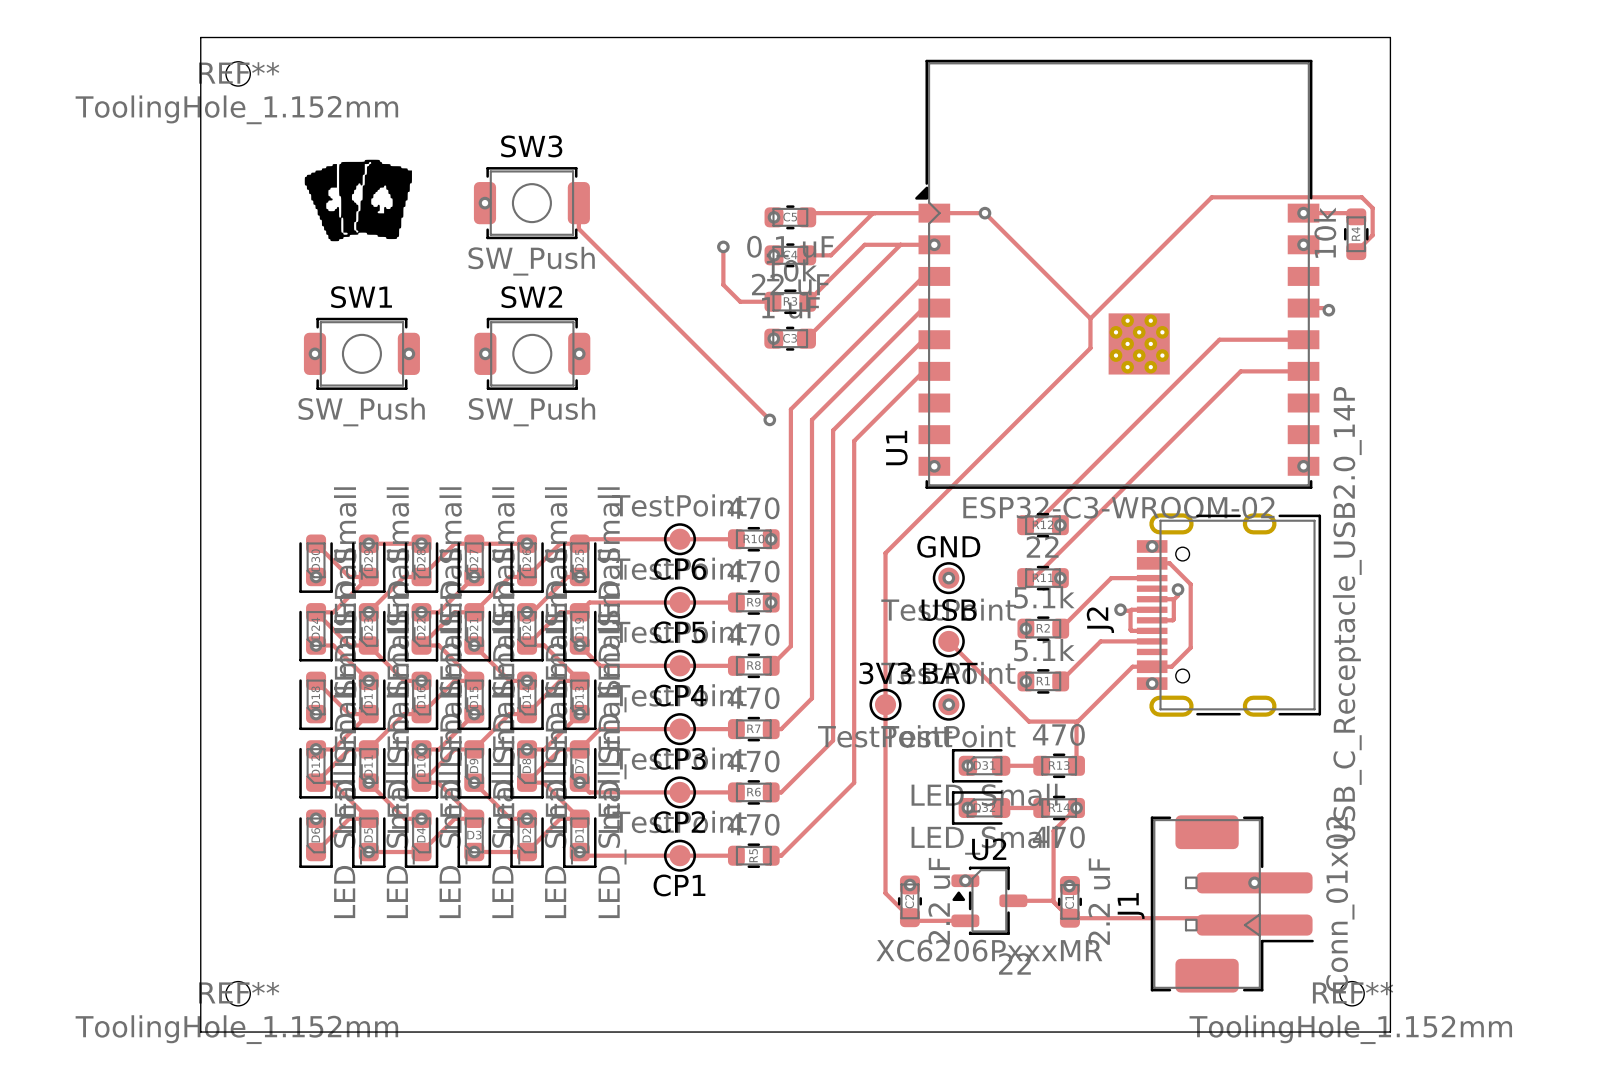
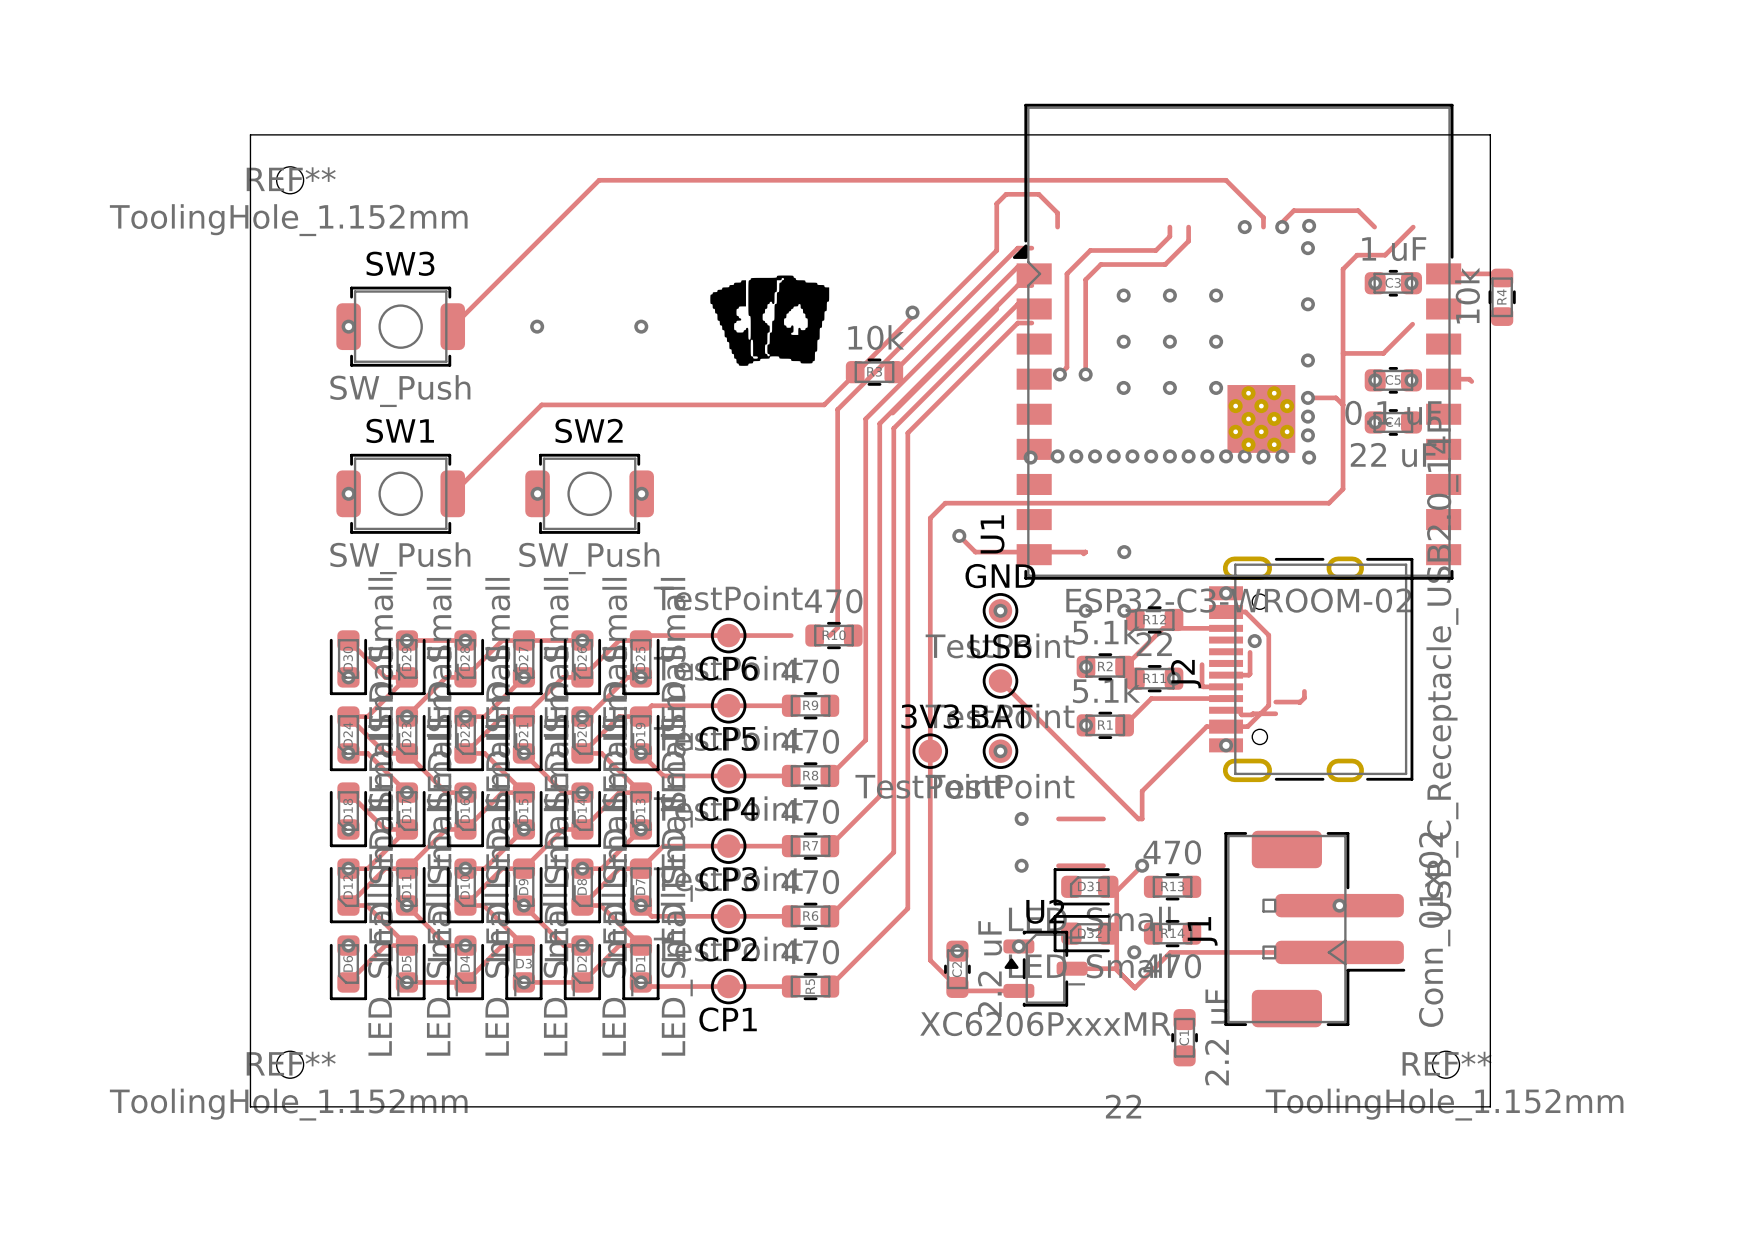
board edge: (200, 37) (1390, 37) (1390, 1032) (200, 1032) (200, 37) -> (250, 134) (250, 1106) (1490, 1106) (1490, 134) (250, 134)
REF** position: (238, 73) -> (290, 180)
via: none -> (1309, 225)
track: none -> (1057, 227) (1057, 213) (1038, 194) (1006, 194) (996, 203) (996, 250) (837, 409) (837, 627) (829, 635)
track: none -> (1169, 227) (1169, 236) (1155, 250) (1090, 250) (1066, 273) (1066, 367) (1059, 374)
track: none -> (1188, 227) (1188, 241) (1165, 264) (1100, 264) (1085, 279) (1085, 374)
via: none -> (1244, 227)
track: none -> (1263, 227) (1263, 217) (1226, 180) (599, 180) (452, 326)
track: none -> (1282, 227) (1282, 222) (1293, 210) (1358, 210) (1374, 227)
via: none -> (1282, 227)
track: none -> (1413, 227) (1385, 255) (1357, 255) (1343, 269) (1343, 489) (1329, 503) (945, 503) (930, 518) (930, 960) (960, 990) (1018, 990)
via: none -> (1307, 248)
drawing position: (358, 200) -> (769, 320)
via: (484, 203) -> none
SW3 position: (531, 203) -> (400, 326)
track: (578, 203) (578, 228) (769, 419) -> none
track: none -> (1031, 266) (1017, 266) (865, 418) (865, 740) (829, 775)
track: (873, 213) (830, 255) (806, 255) -> none
via: (984, 213) -> none
via: (1303, 213) -> none
via: (774, 217) -> none
C5 position: (790, 217) -> (1393, 380)
track: (806, 217) (810, 213) (984, 213) (1090, 318) -> none
via: none -> (1375, 283)
via: none -> (1411, 283)
track: none -> (1031, 285) (1017, 285) (879, 423) (879, 796) (829, 846)
via: none -> (1123, 295)
via: none -> (1169, 295)
via: none -> (1216, 295)
track: none -> (1031, 304) (1017, 304) (893, 428) (893, 852) (829, 916)
via: none -> (1307, 304)
track: (864, 244) (934, 244) -> (956, 308) (1017, 248) (1031, 248)
via: (934, 244) -> none
via: (1303, 244) -> none
track: (723, 246) (723, 284) (740, 301) (772, 301) -> none
via: (723, 246) -> none
track: none -> (912, 312) (912, 316) (824, 404) (541, 404) (452, 493)
via: none -> (912, 312)
track: (1356, 251) (1372, 235) (1372, 208) (1361, 197) (1211, 197) (1090, 318) -> none
via: (774, 255) -> none
C4 position: (790, 255) -> (1393, 422)
track: none -> (1031, 323) (1017, 323) (907, 432) (907, 908) (829, 986)
track: none -> (1412, 324) (1383, 353) (1343, 353)
via: none -> (348, 326)
via: none -> (537, 326)
via: none -> (641, 326)
via: none -> (1123, 341)
via: none -> (1169, 341)
via: none -> (1216, 341)
track: (934, 276) (923, 276) (790, 409) (790, 646) (771, 665) -> none
via: none -> (1307, 360)
via: none -> (1059, 374)
via: none -> (1085, 374)
track: (934, 308) (923, 308) (811, 419) (811, 698) (781, 729) (771, 729) -> none
via: none -> (1375, 380)
via: none -> (1411, 380)
via: (1328, 310) -> none
via: none -> (1123, 387)
via: none -> (1169, 387)
via: none -> (1216, 387)
track: (1090, 318) (1090, 348) (885, 553) (885, 893) (913, 920) (965, 920) -> none
track: none -> (1307, 397) (1336, 397) (1343, 404)
via: none -> (1307, 397)
via: (773, 338) -> none
C3 position: (790, 338) -> (1393, 283)
track: (934, 339) (923, 339) (833, 430) (833, 740) (781, 792) (771, 792) -> none
track: (1303, 339) (1219, 339) (1034, 525) (1023, 526) -> none
via: none -> (1307, 416)
via: none -> (1375, 422)
via: (315, 353) -> none
SW1 position: (361, 353) -> (400, 493)
via: (408, 353) -> none
via: (485, 353) -> none
SW2 position: (532, 353) -> (589, 493)
via: (579, 353) -> none
via: none -> (1307, 435)
track: (934, 371) (923, 371) (854, 440) (854, 782) (781, 855) (771, 855) -> none
track: (1303, 371) (1240, 371) (1034, 578) (1023, 579) -> none
via: none -> (1057, 456)
via: none -> (1076, 456)
via: none -> (1095, 456)
via: none -> (1113, 456)
via: none -> (1132, 456)
via: none -> (1151, 456)
via: none -> (1169, 456)
via: none -> (1188, 456)
via: none -> (1207, 456)
via: none -> (1226, 456)
via: none -> (1244, 456)
via: none -> (1263, 456)
via: none -> (1282, 456)
via: none -> (1030, 457)
via: none -> (1309, 457)
via: none -> (348, 493)
via: none -> (537, 493)
via: none -> (641, 493)
via: (769, 419) -> none
track: none -> (959, 535) (975, 552) (1085, 552) (1083, 553)
via: none -> (959, 535)
via: none -> (1124, 552)
via: (934, 466) -> none
via: (1303, 466) -> none
via: none -> (1226, 593)
via: none -> (1000, 610)
via: none -> (1085, 610)
via: none -> (1124, 610)
track: none -> (1226, 611) (1245, 611) (1268, 635) (1268, 705) (1247, 726) (1206, 726) (1142, 791) (1142, 818) (1138, 818) (1000, 681)
via: (1060, 525) -> none
track: none -> (1226, 628) (1163, 628) (1124, 666)
CP6 position: (679, 539) -> (728, 635)
track: (715, 539) (736, 539) -> none
via: (771, 539) -> none
via position: (1152, 546) -> (1254, 641)
track: (1152, 563) (1169, 563) (1190, 584) (1190, 647) (1171, 666) (1132, 666) (1076, 722) (1076, 765) -> none
via: none -> (1086, 666)
GND position: (948, 578) -> (1000, 610)
via: (948, 578) -> none
track: (1152, 578) (1111, 578) (1060, 628) -> none
via: (1178, 589) -> none
track: none -> (1226, 698) (1151, 698) (1124, 725)
track: (1173, 599) (1172, 620) (1152, 620) -> (1250, 652) (1248, 675) (1226, 675)
CP5 position: (679, 602) -> (728, 705)
track: (715, 602) (736, 602) -> none
R9 position: (753, 602) -> (810, 705)
via: (771, 602) -> none
via position: (1120, 609) -> (1226, 745)
track: (1130, 610) (1131, 630) (1152, 630) -> (1202, 664) (1203, 686) (1226, 686)
J2 position: (1228, 615) -> (1311, 669)
via: none -> (1086, 725)
J2 name position: J2 (1100, 620) -> J2 (1186, 674)
via: (1025, 628) -> none
R2 position: (1043, 628) -> (1105, 666)
track: (948, 641) (1028, 721) (1077, 721) -> none
USB position: (948, 641) -> (1000, 681)
track: (1152, 641) (1100, 641) (1060, 681) -> none
via: none -> (1000, 751)
CP4 position: (679, 665) -> (728, 775)
track: (715, 665) (736, 665) -> none
R8 position: (753, 665) -> (810, 775)
via: (1025, 681) -> none
R1 position: (1043, 681) -> (1105, 725)
via: (1152, 683) -> none
3V3 position: (885, 704) -> (930, 751)
via: none -> (1021, 818)
BAT position: (948, 704) -> (1000, 751)
via: (948, 704) -> none
CP3 position: (679, 729) -> (728, 846)
track: (715, 729) (736, 729) -> none
R7 position: (753, 729) -> (810, 846)
via: none -> (1021, 865)
via: none -> (1142, 865)
via: (967, 765) -> none
track: (1001, 765) (1041, 765) -> (1058, 818) (1103, 818)
via: none -> (1339, 905)
CP2 position: (679, 792) -> (728, 916)
track: (715, 792) (736, 792) -> none
R6 position: (753, 792) -> (810, 916)
via: (967, 807) -> none
track: (1001, 807) (1041, 807) -> (1058, 865) (1103, 865)
track: (1074, 807) (1076, 807) (1053, 830) (1053, 901) -> (1140, 865) (1142, 865) (1116, 891) (1116, 969)
via: (1076, 807) -> none
via: none -> (1018, 946)
via: none -> (957, 951)
via: none -> (1134, 952)
track: none -> (1339, 952) (1170, 952) (1134, 987) (1115, 968) (1072, 968)
CP1 position: (679, 855) -> (728, 986)
track: (715, 855) (736, 855) -> none
R5 position: (753, 855) -> (810, 986)
via: (965, 880) -> none
via: (1254, 882) -> none
via: (909, 884) -> none
via: (1069, 886) -> none
U2 position: (989, 900) -> (1045, 968)
track: (1013, 900) (1052, 900) (1069, 918) (1247, 918) (1254, 925) -> none
C2 position: (909, 901) -> (957, 969)
J1 position: (1232, 903) -> (1314, 929)
REF** position: (238, 993) -> (290, 1064)
REF** position: (1352, 993) -> (1445, 1064)

